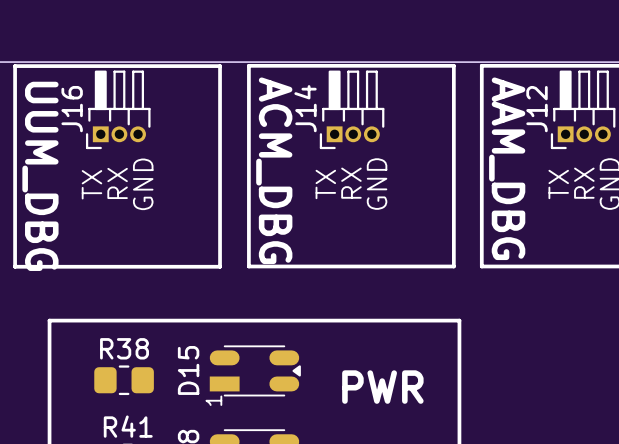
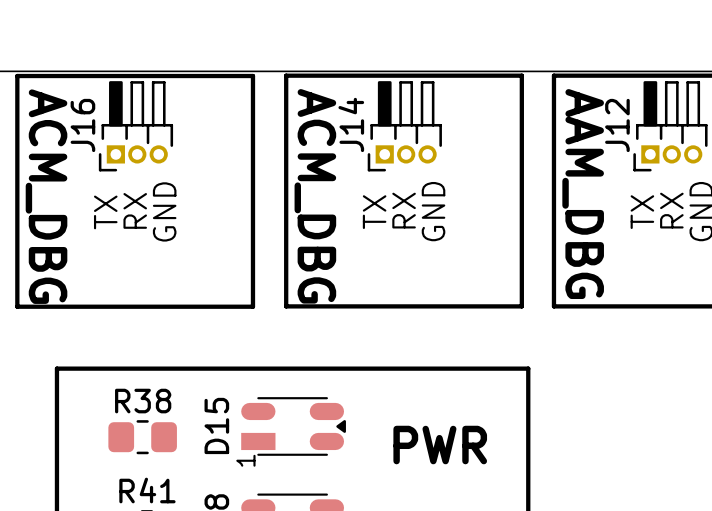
text: UUM_DBG (40, 176) -> ACM_DBG (46, 196)

